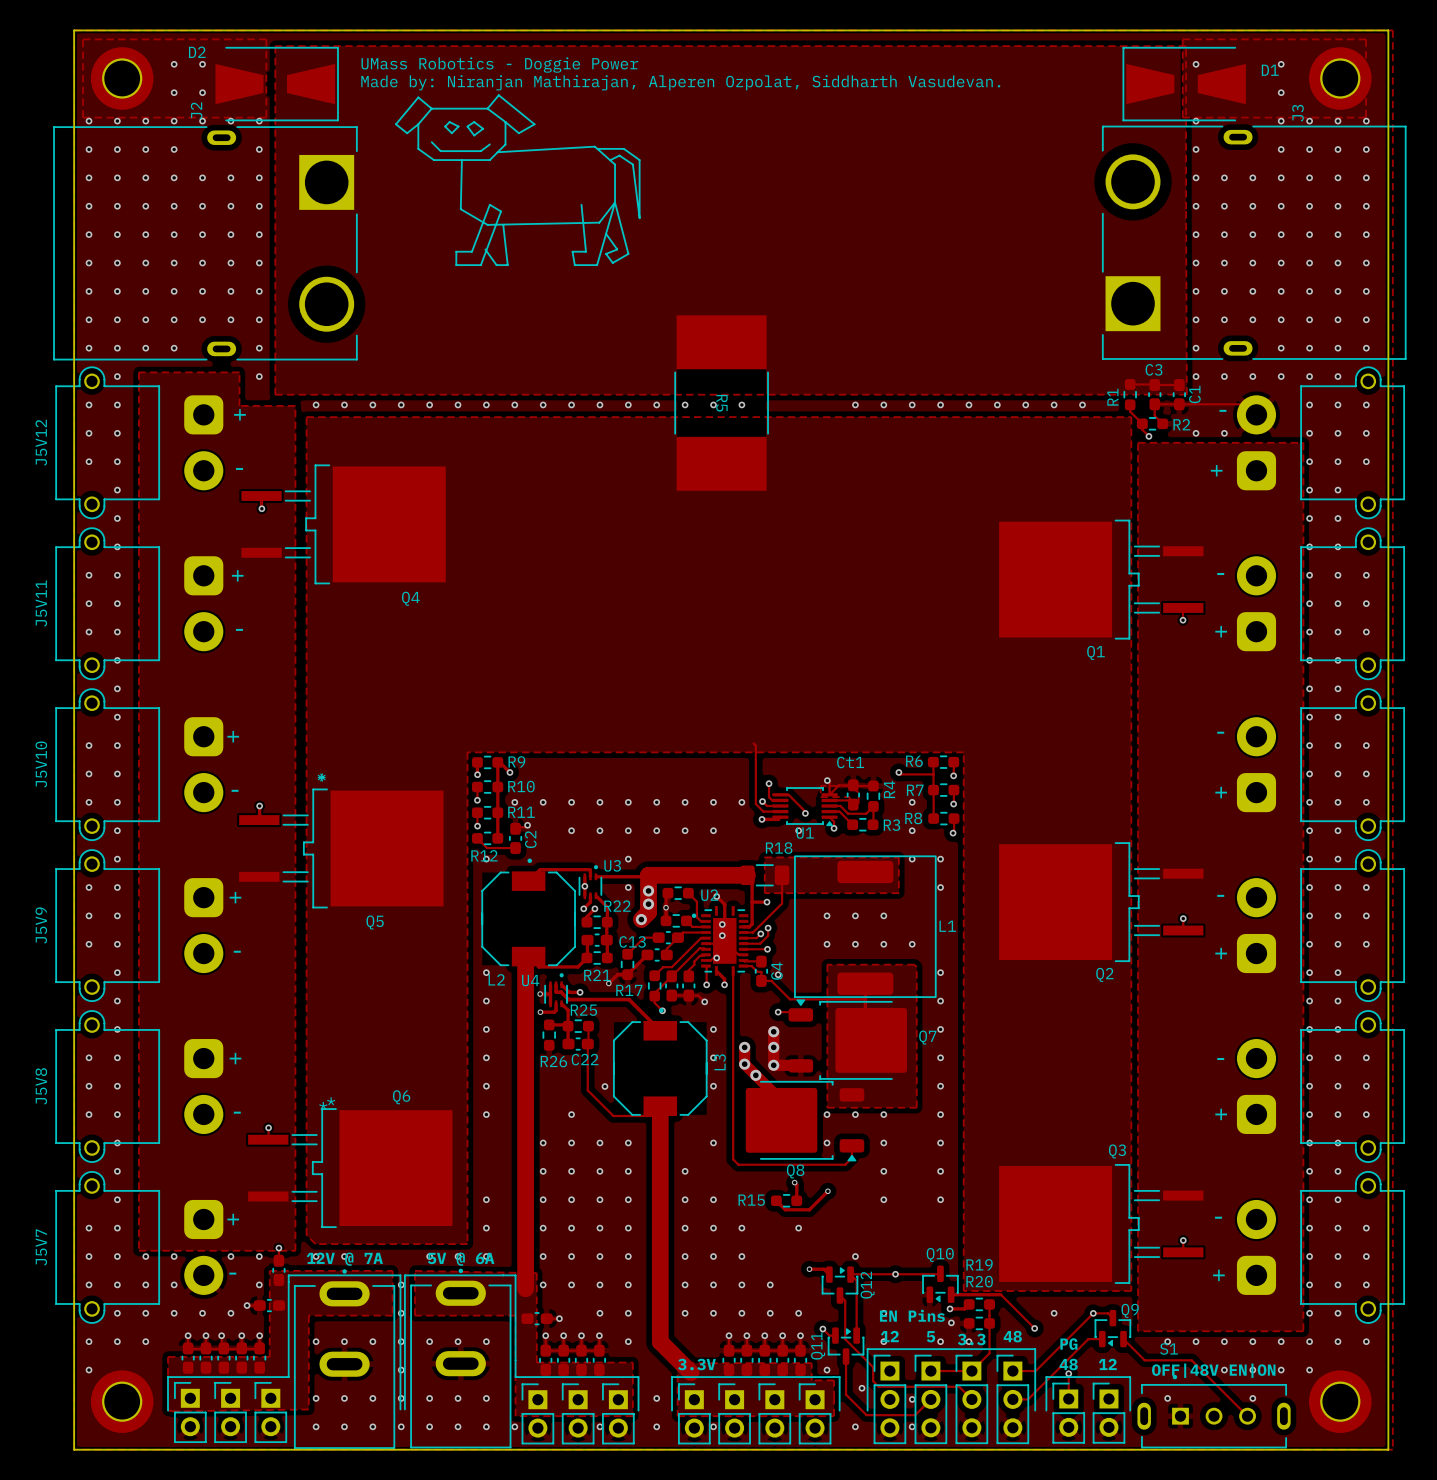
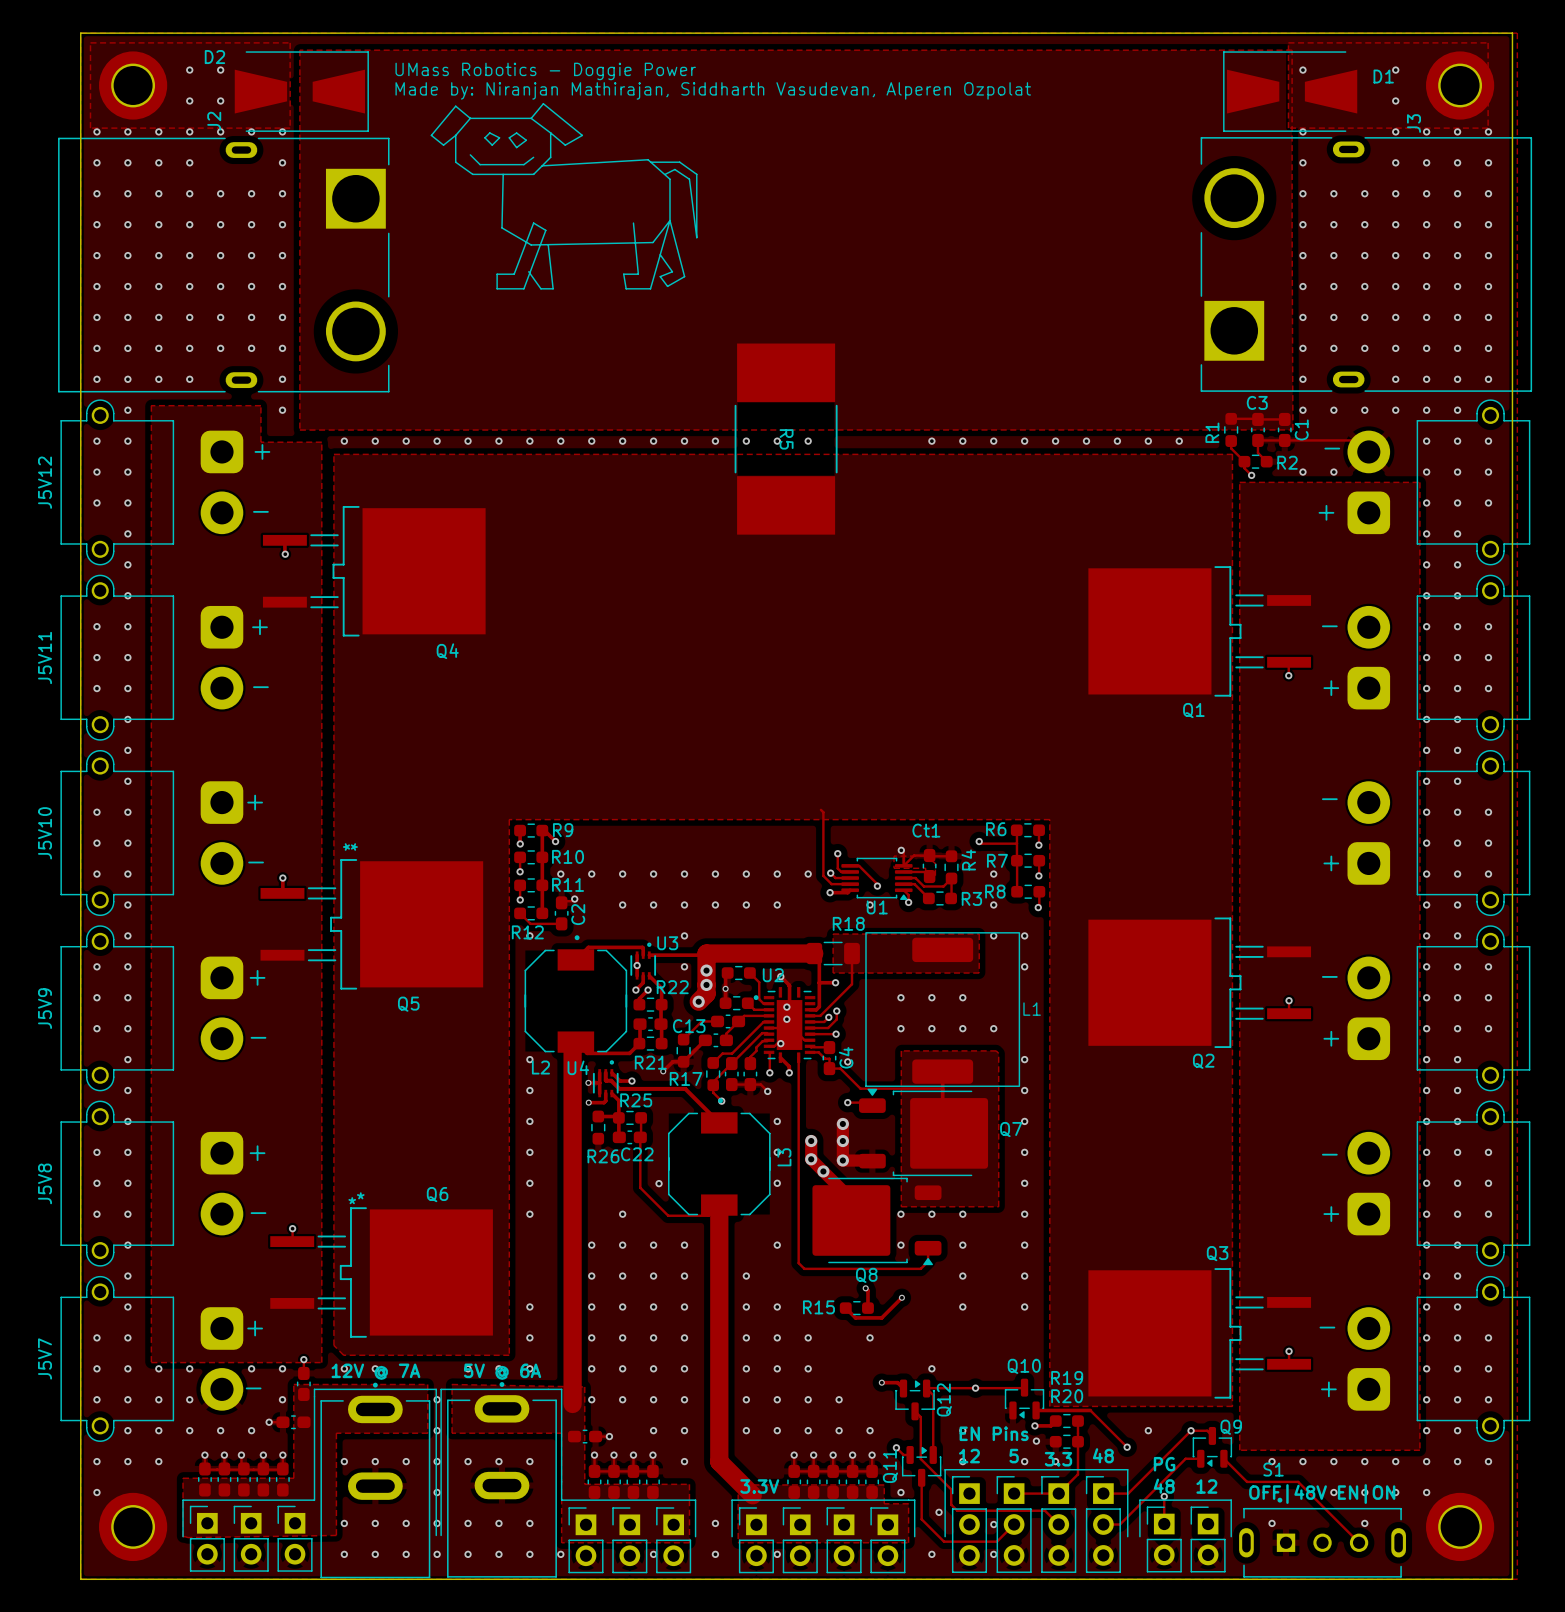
text: Made by: Niranjan Mathirajan, Alperen Ozpolat, Siddharth Vasudevan. (680, 82) -> Made by: Niranjan Mathirajan, Siddharth Vasudevan, Alperen Ozpolat (713, 90)

